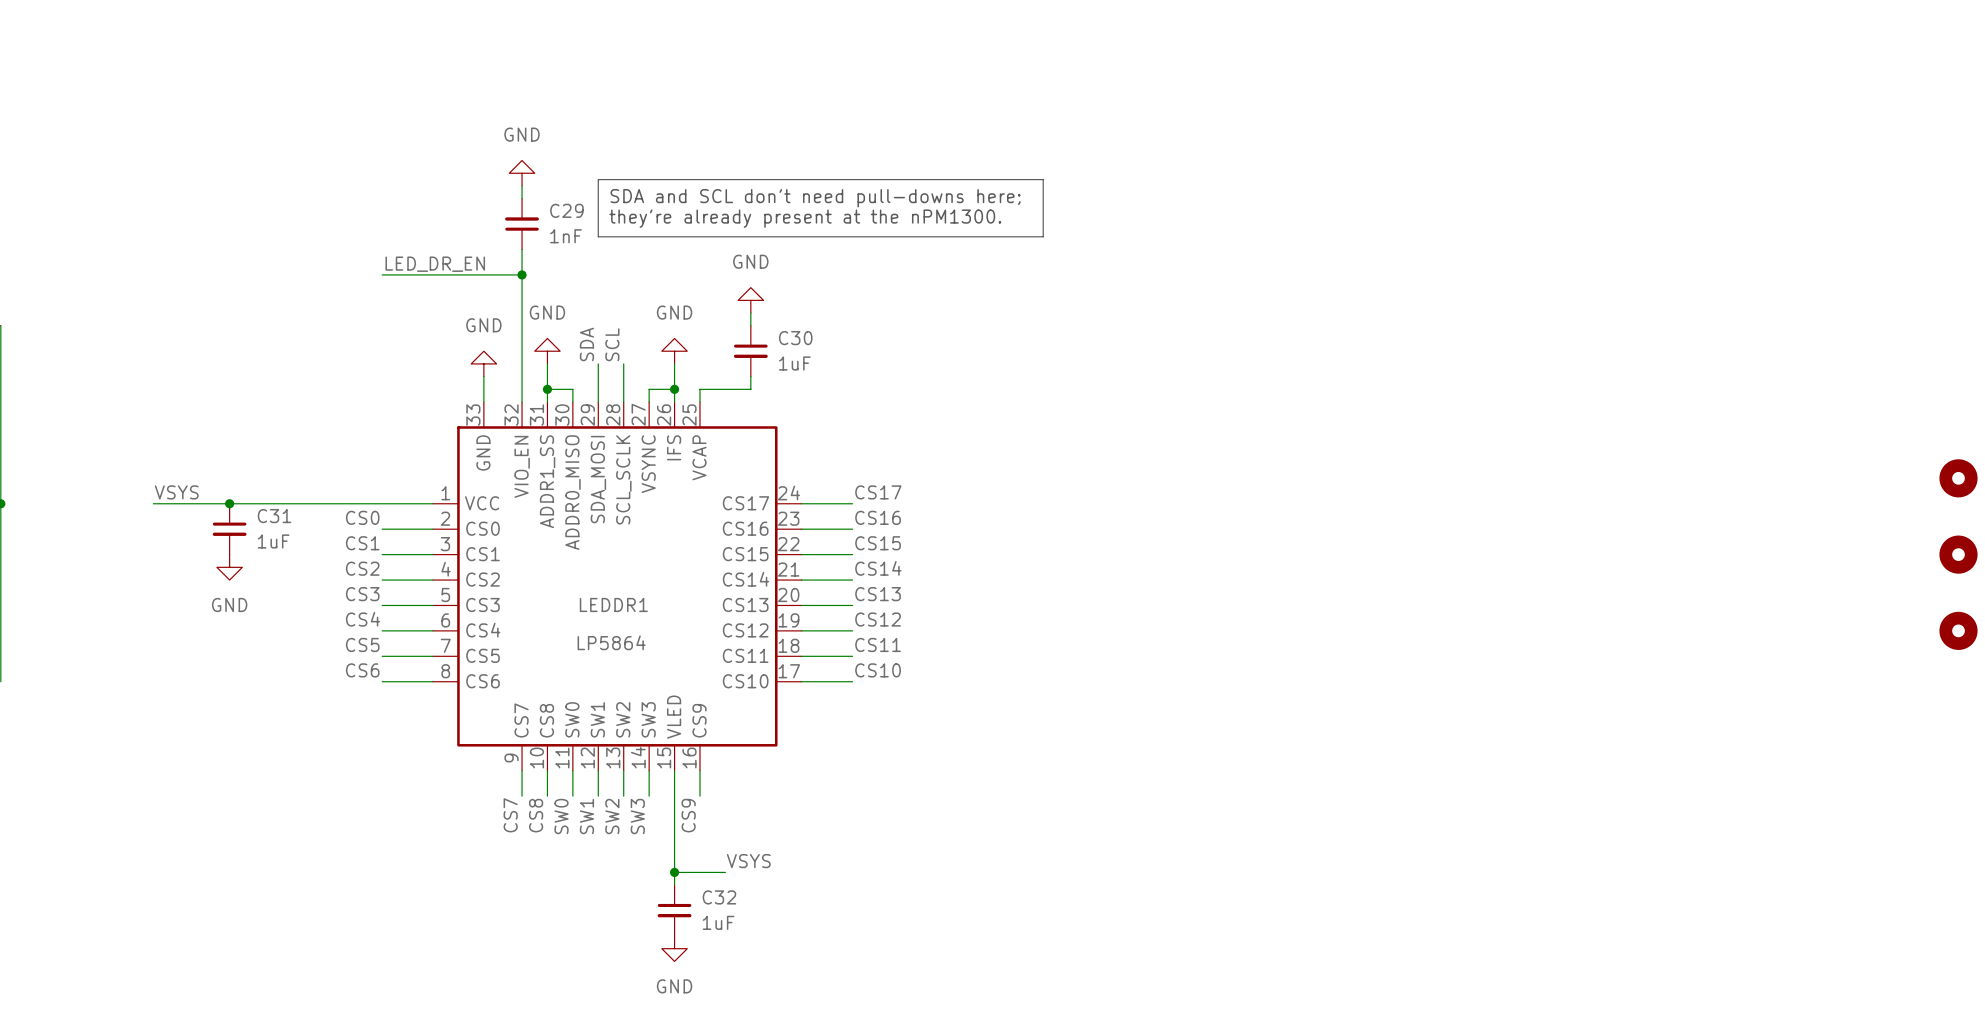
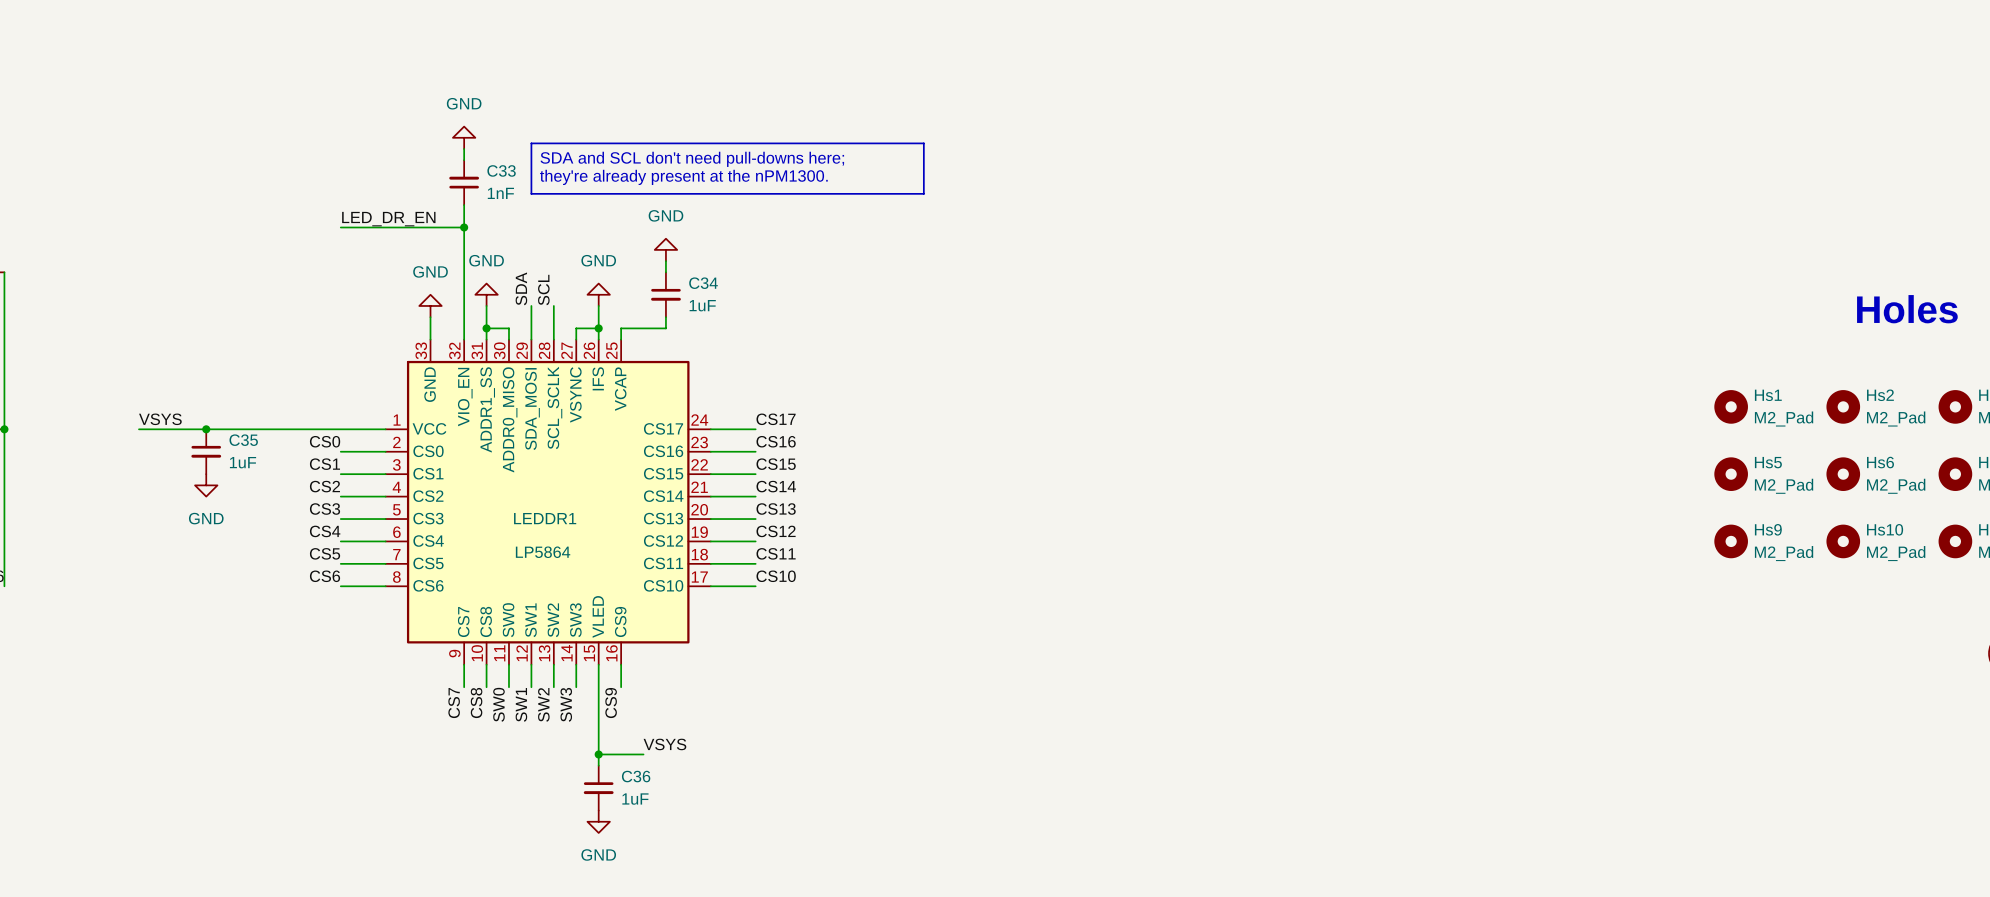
C29 name: C29 (566, 210) -> C33 (501, 170)
C30 name: C30 (795, 338) -> C34 (703, 283)
C31 name: C31 (274, 516) -> C35 (243, 440)
C32 name: C32 (719, 897) -> C36 (636, 776)

